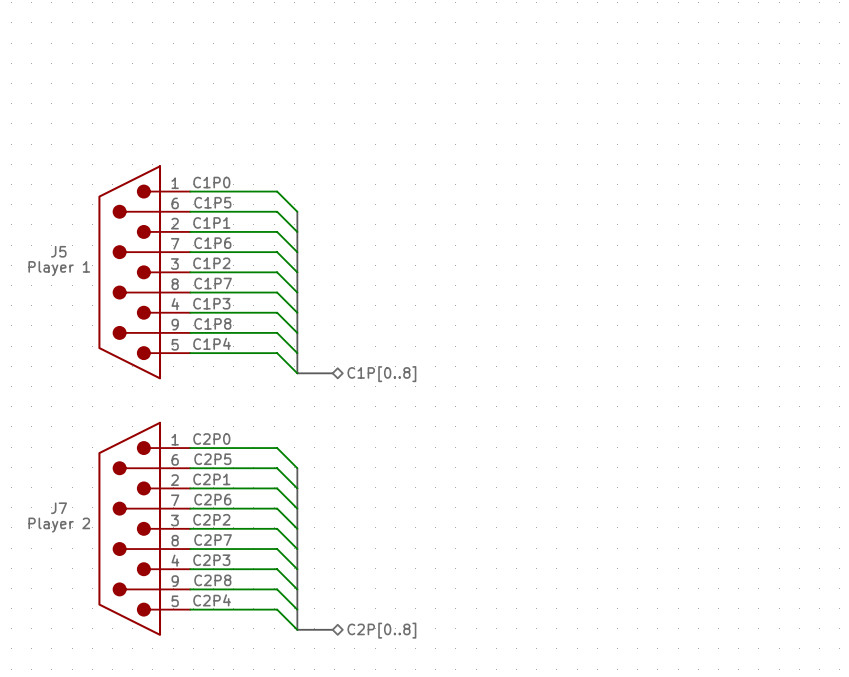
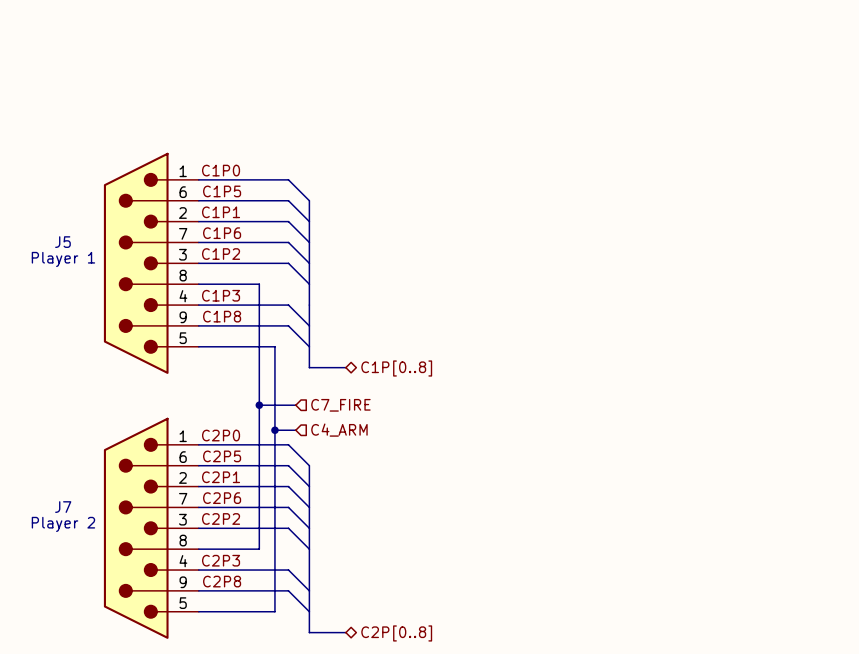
label: C1P7 (213, 283) -> none
wire: (248, 292) (277, 292) (297, 312) -> (259, 284) (259, 549)
label: C1P4 (212, 343) -> none
wire: (264, 353) (277, 353) (297, 373) -> (274, 346) (274, 611)
wire: none -> (259, 405) (295, 405)
junction: none -> (259, 405)
hierarchical label: none -> C7_FIRE (340, 405)
wire: none -> (274, 430) (295, 430)
junction: none -> (274, 430)
hierarchical label: none -> C4_ARM (339, 430)
label: C2P7 (213, 540) -> none
wire: (248, 549) (277, 549) (297, 569) -> none
label: C2P4 (212, 600) -> none
wire: (264, 609) (277, 609) (297, 629) -> none

